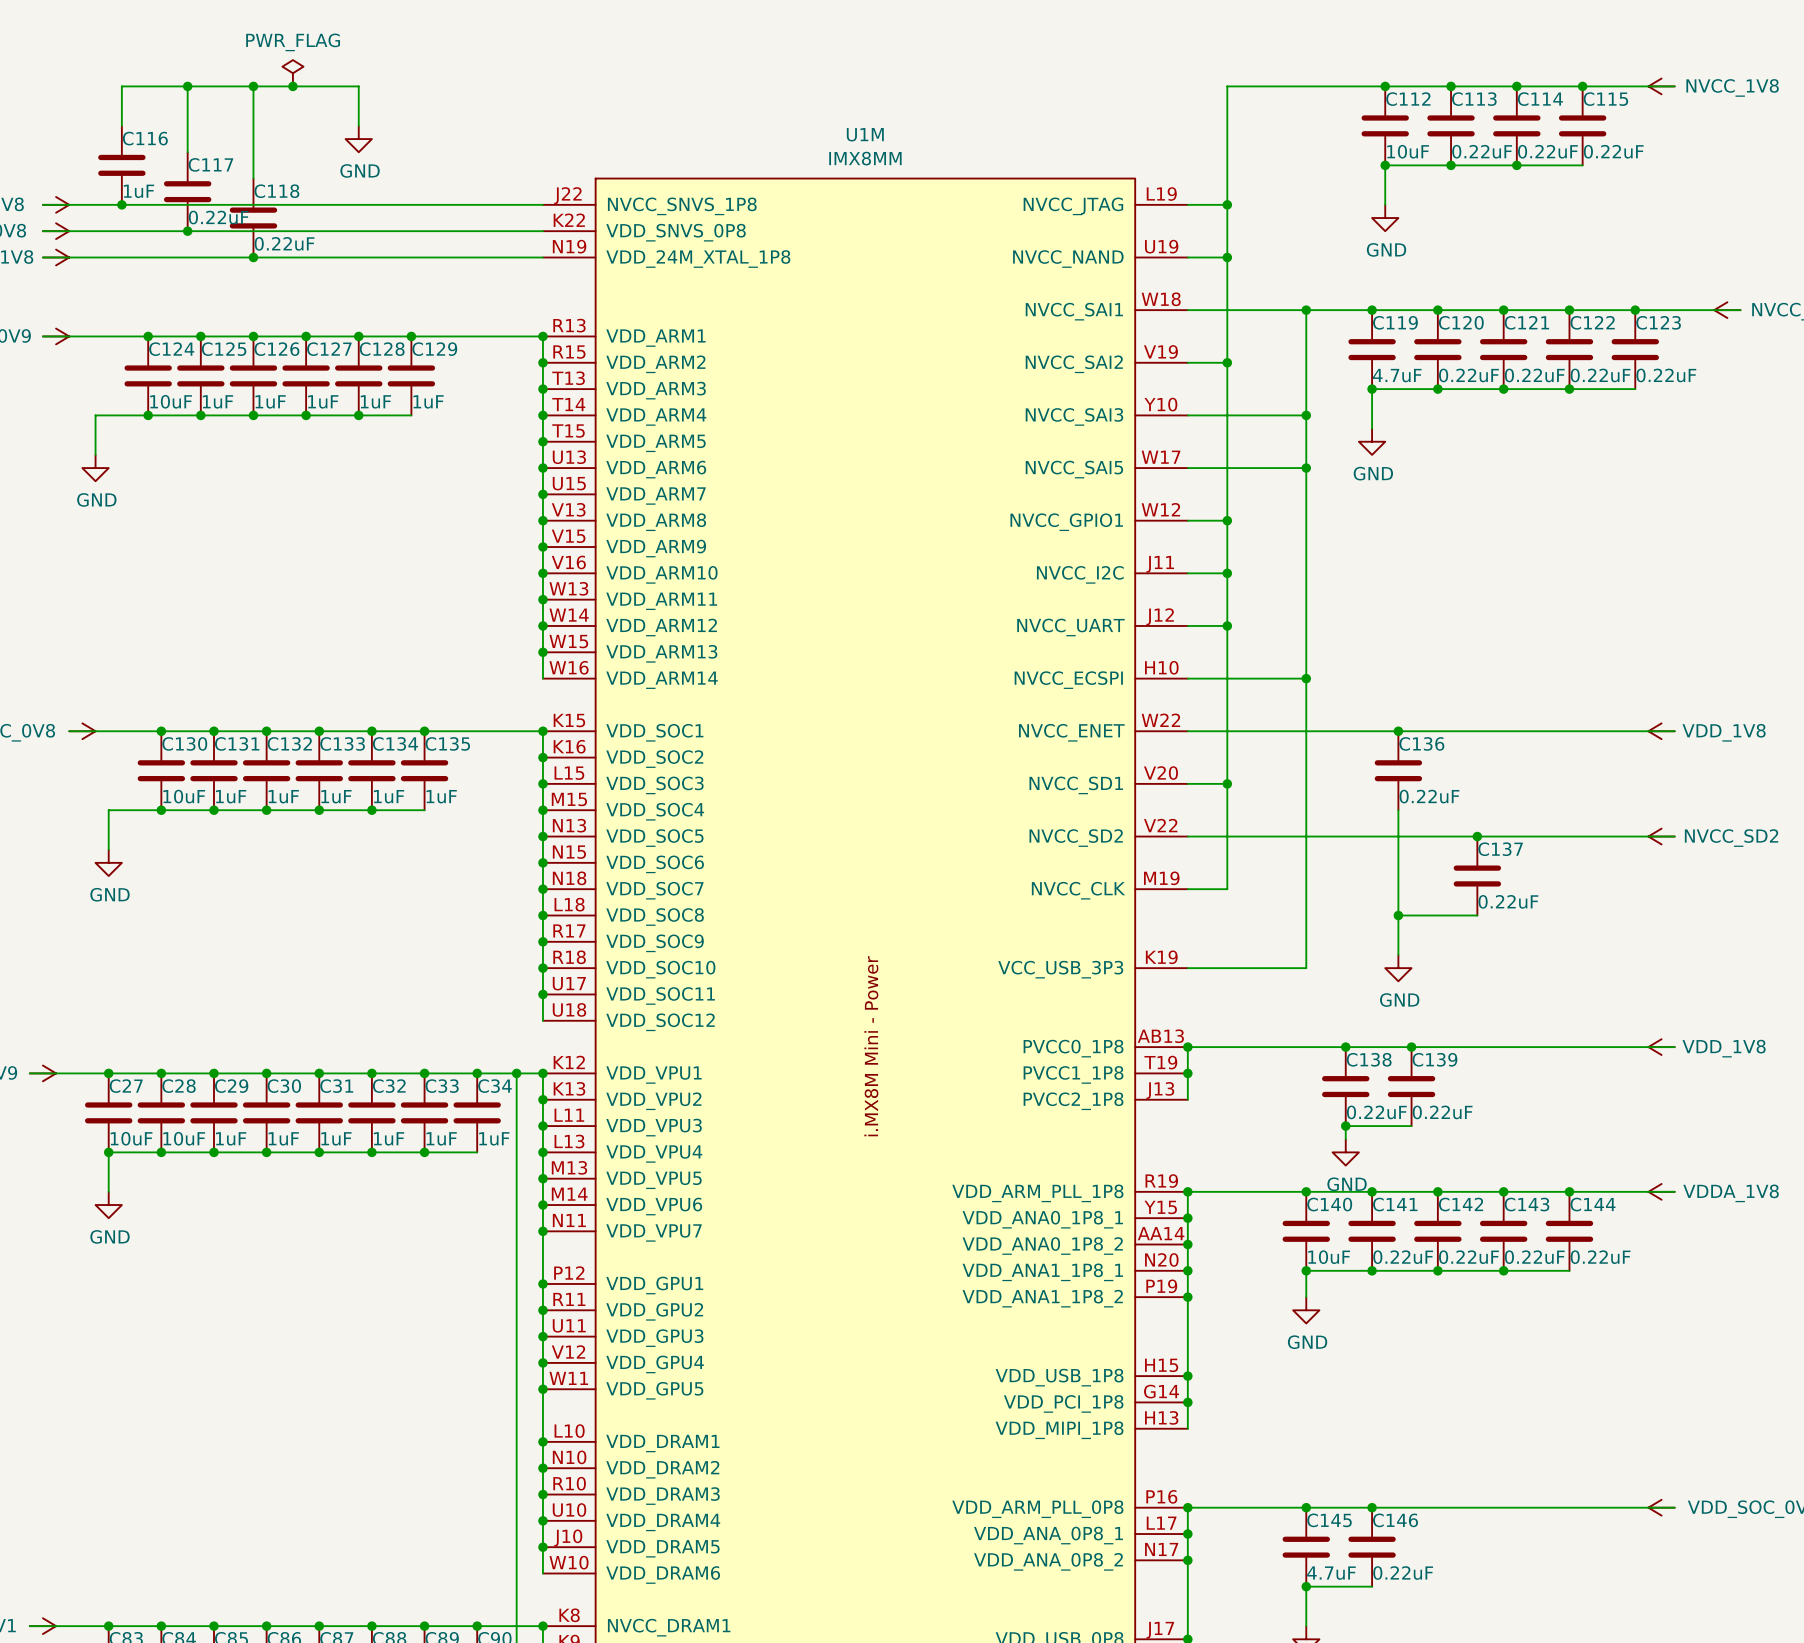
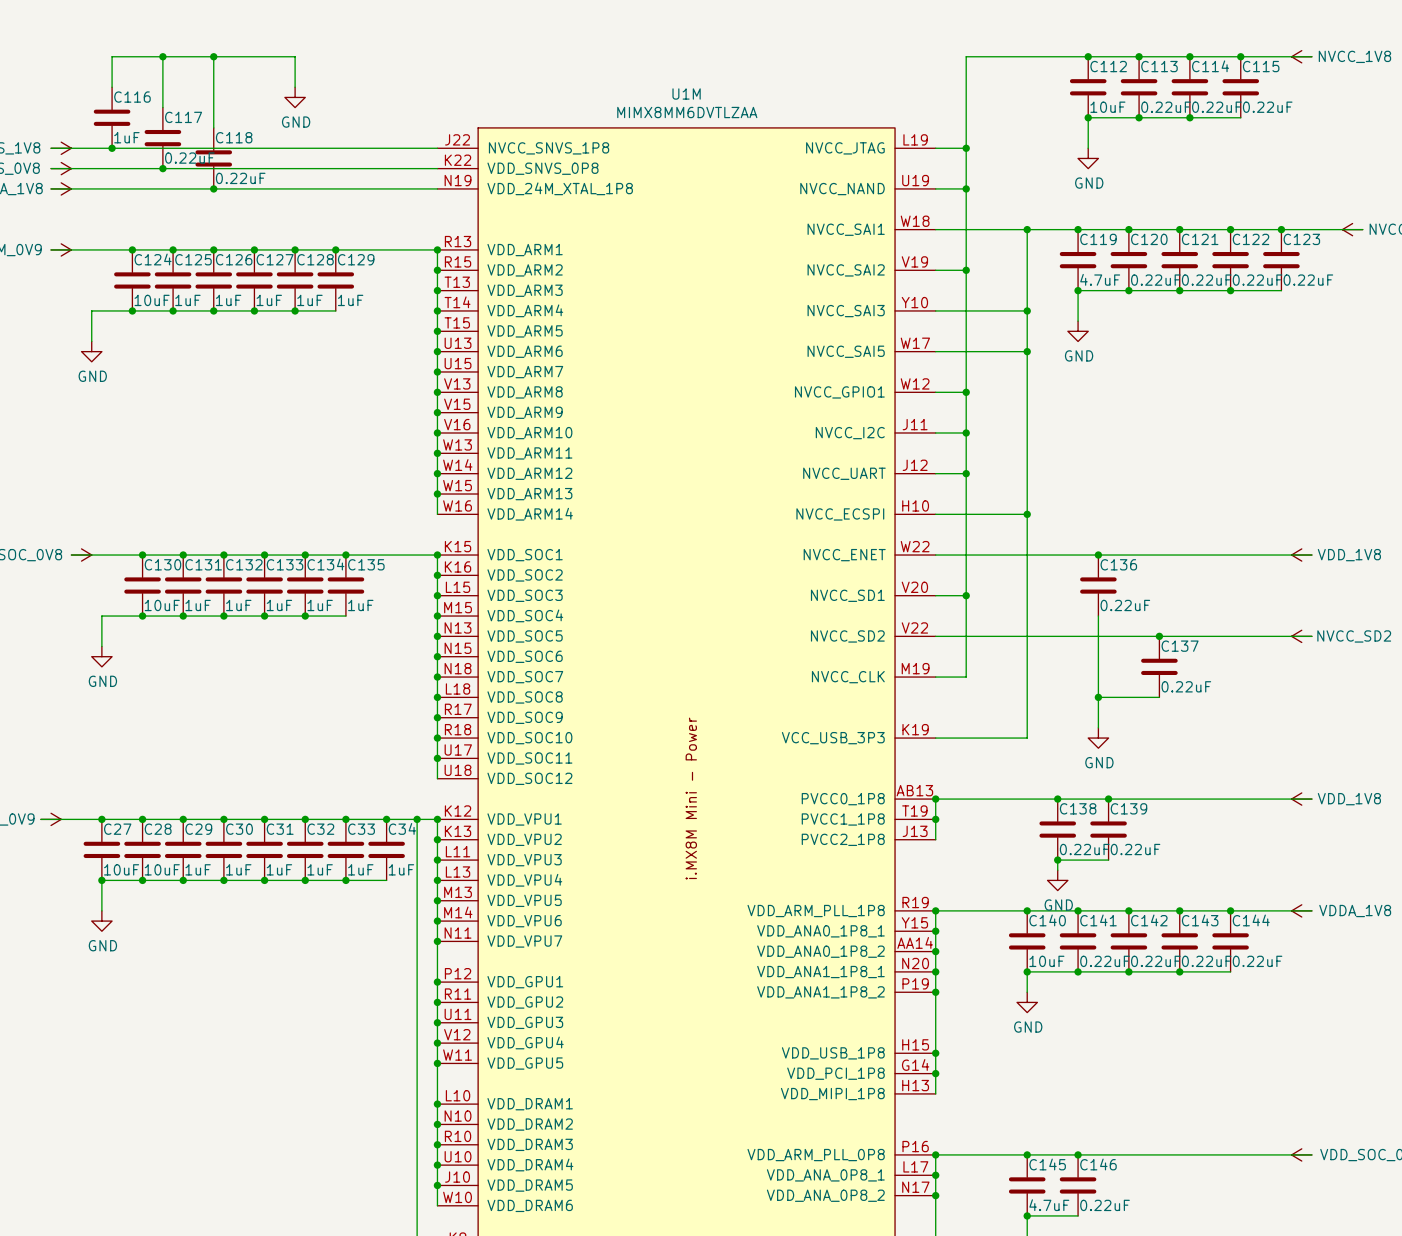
power symbol: PWR_FLAG (292, 73) -> none
junction: (292, 86) -> none
U1M value: IMX8MM (865, 158) -> MIMX8MM6DVTLZAA (687, 112)

